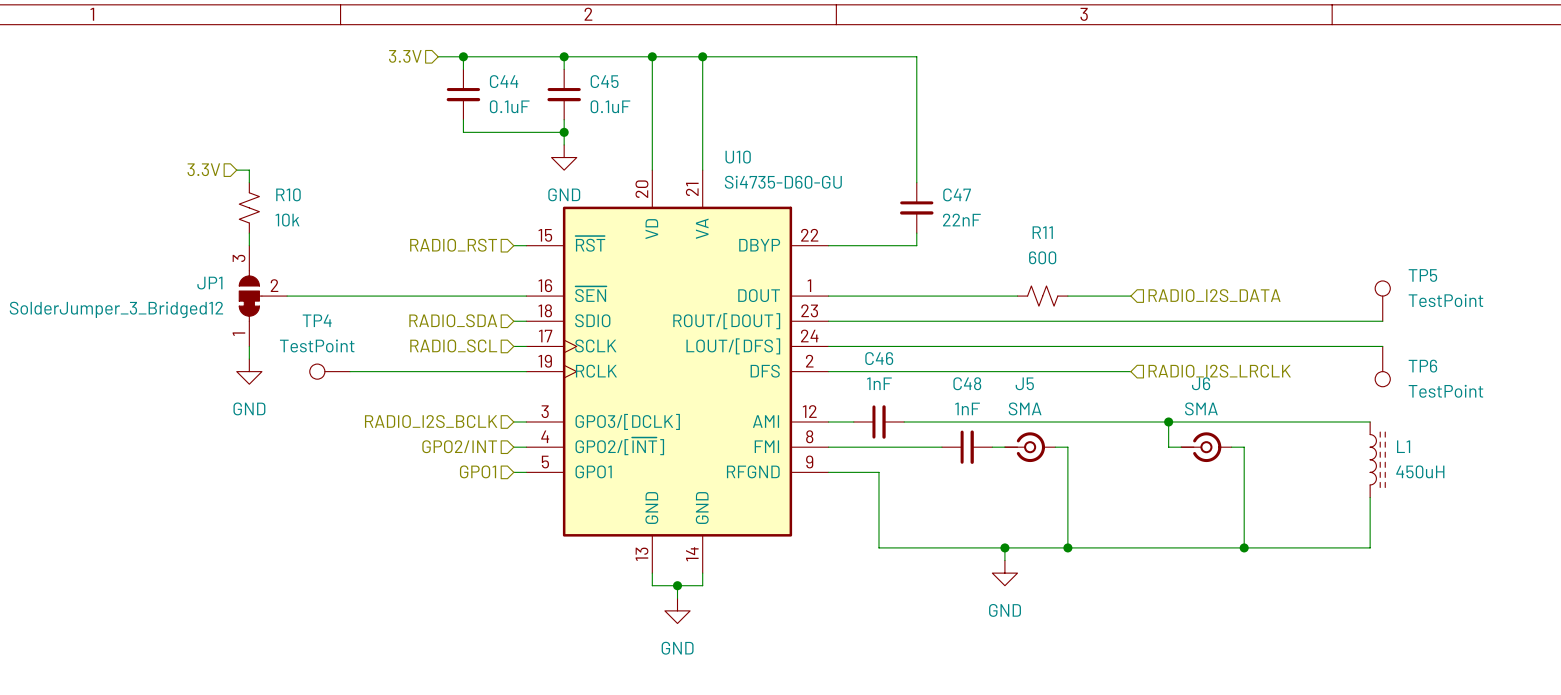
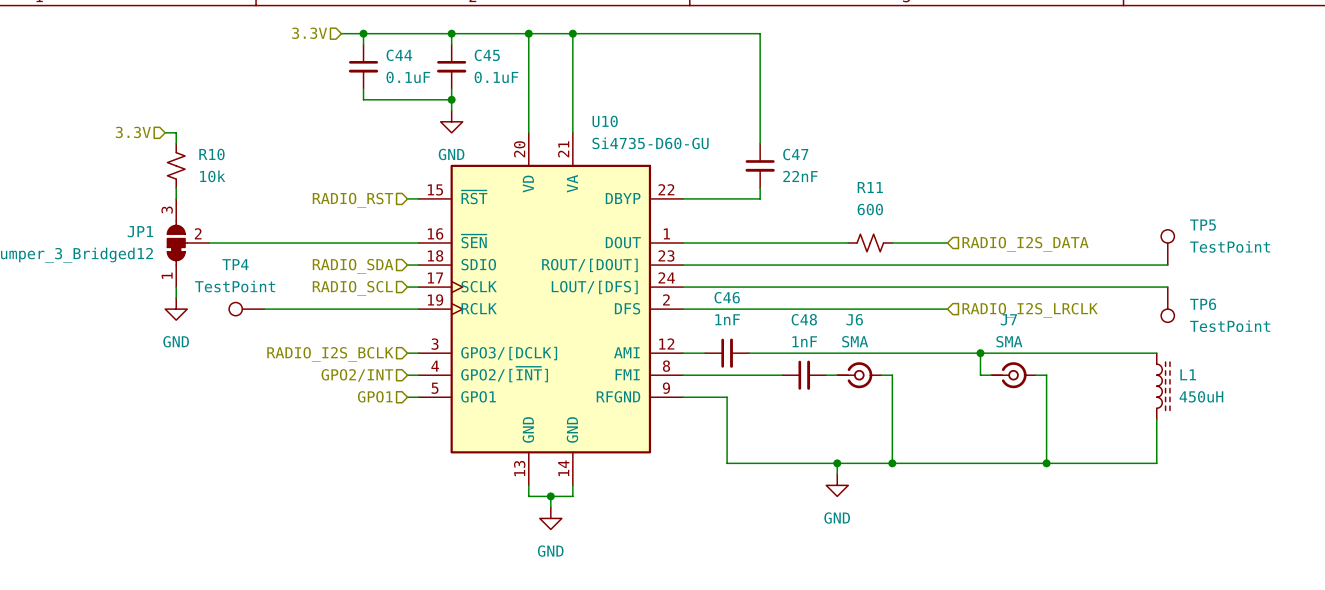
J5 name: J5 (1024, 383) -> J6 (854, 319)
J6 name: J6 (1201, 383) -> J7 (1008, 319)

